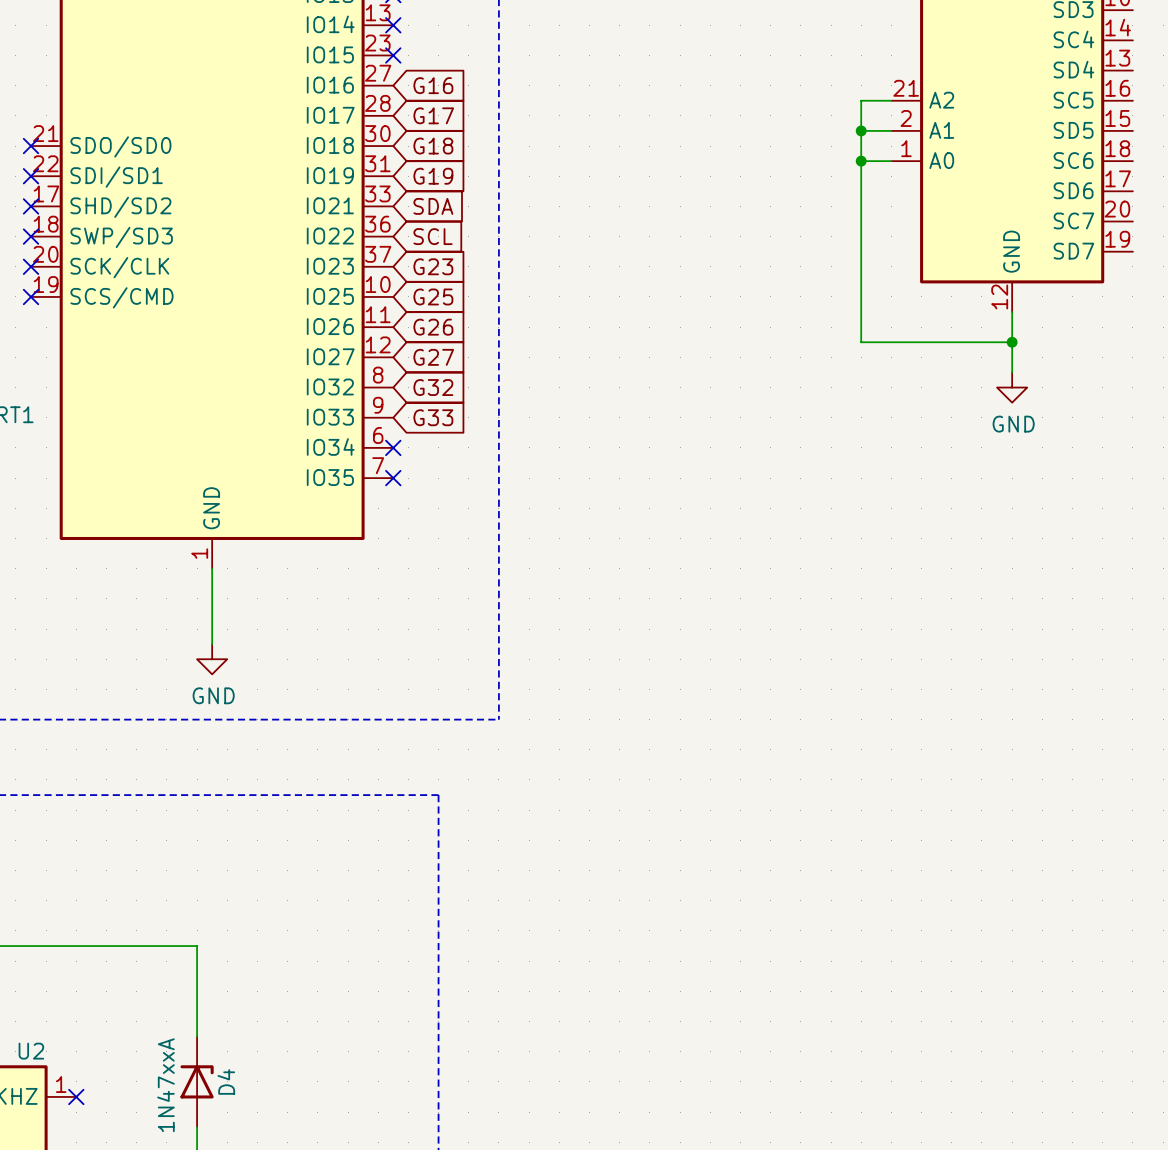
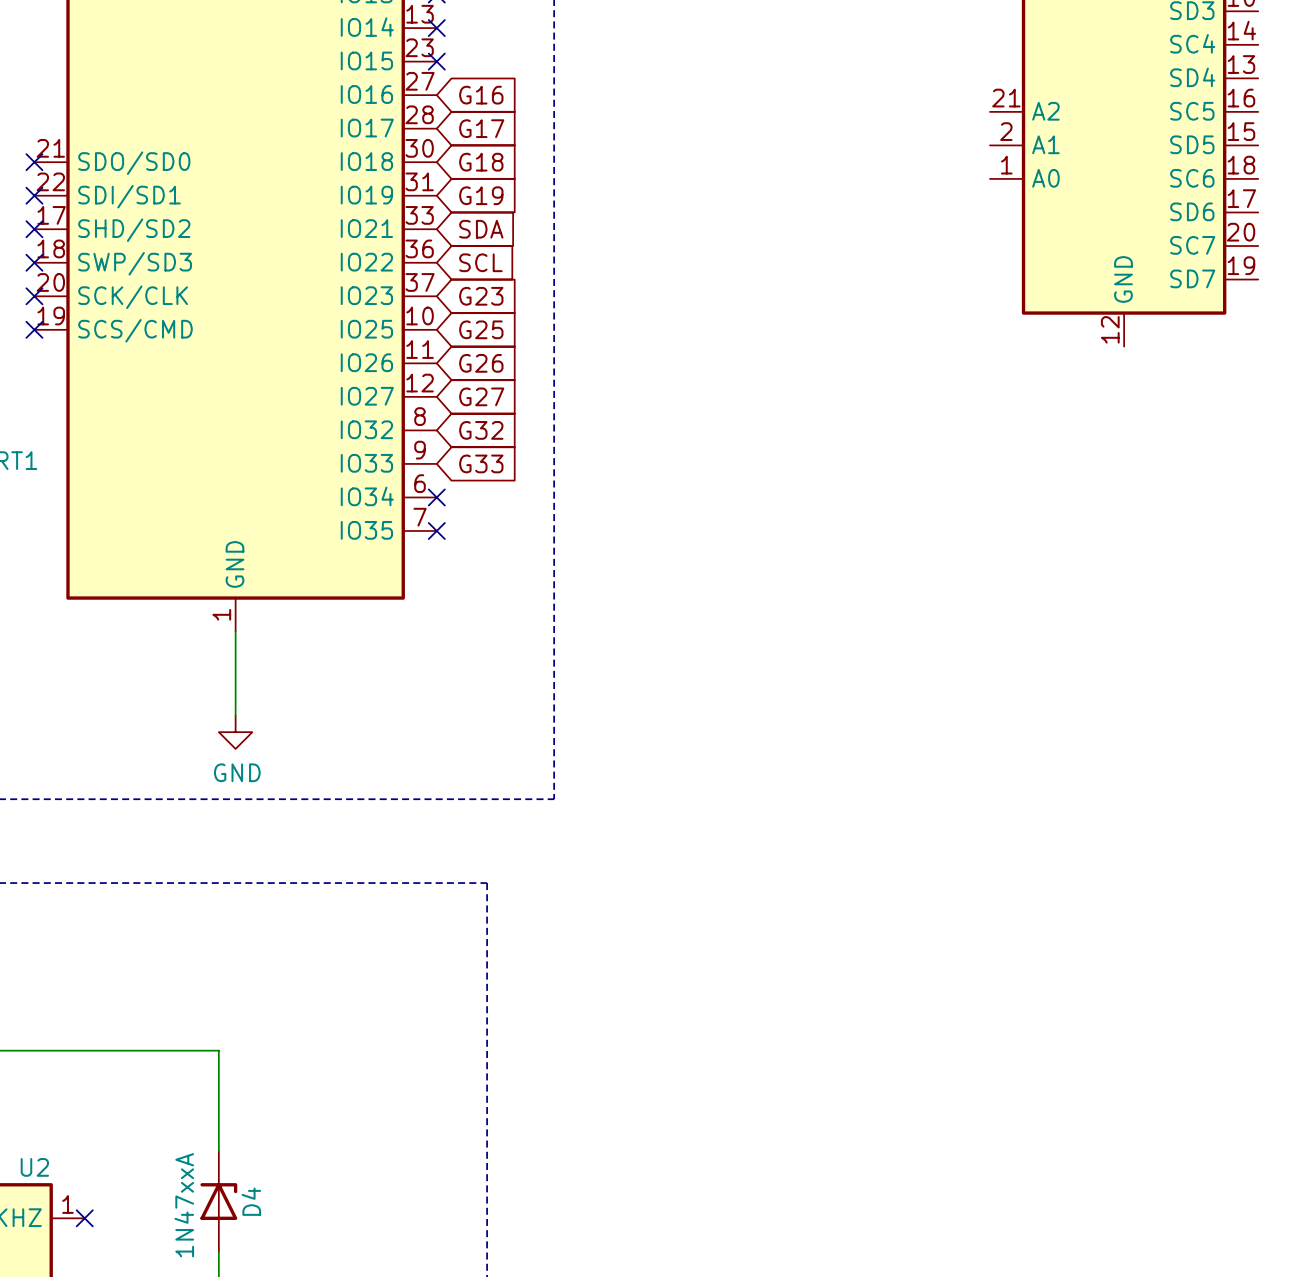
wire: (891, 100) (861, 100) (861, 342) (1012, 342) -> none
wire: (861, 130) (891, 130) -> none
junction: (861, 130) -> none
wire: (861, 161) (891, 161) -> none
junction: (861, 161) -> none
wire: (1012, 312) (1012, 372) -> none
junction: (1012, 342) -> none
power symbol: GND (1012, 387) -> none

